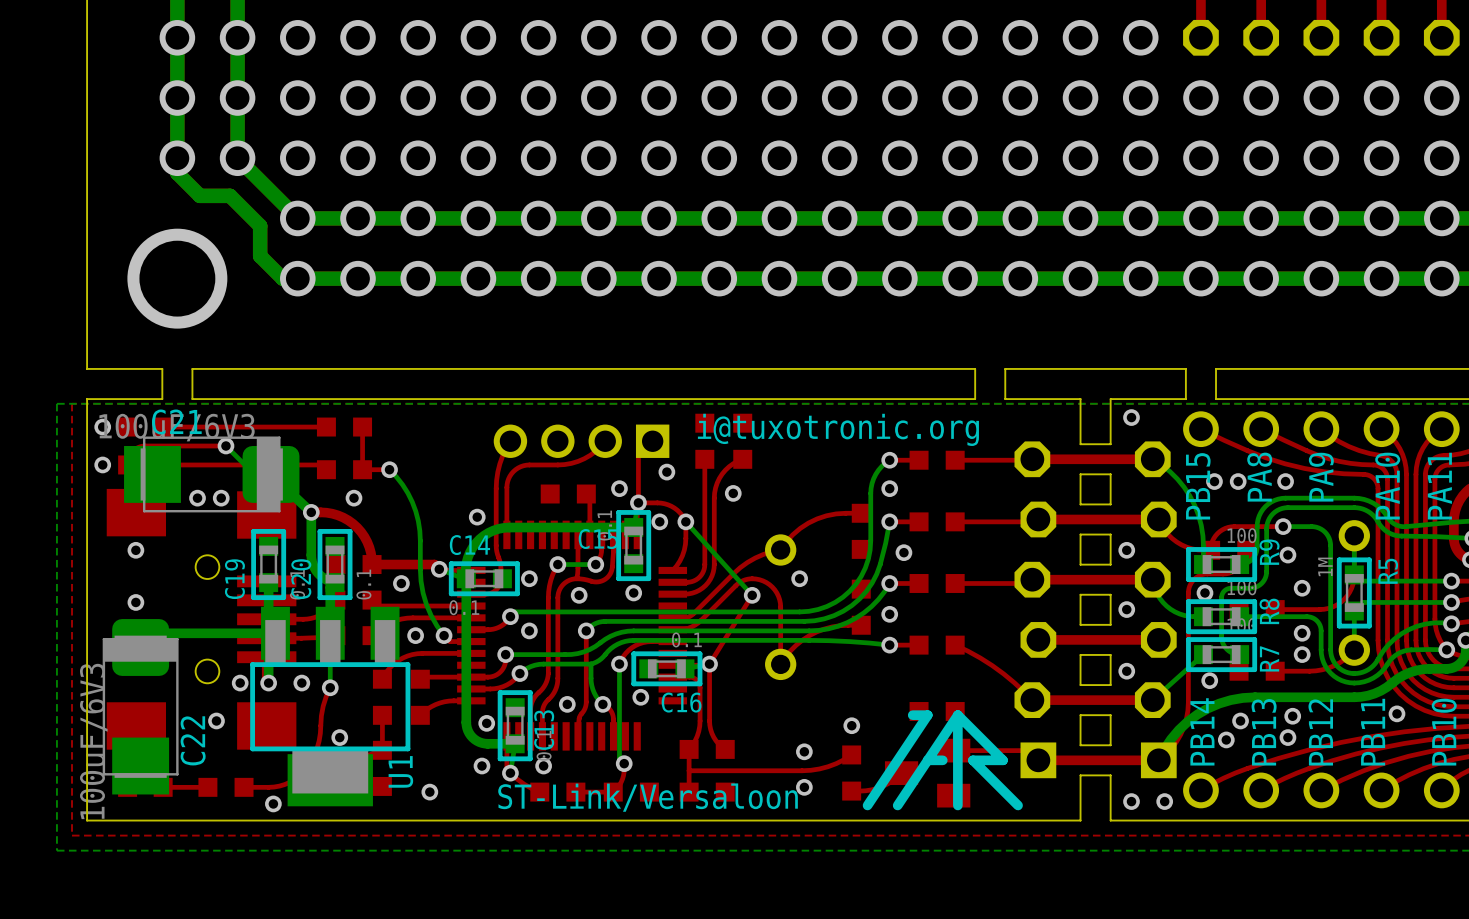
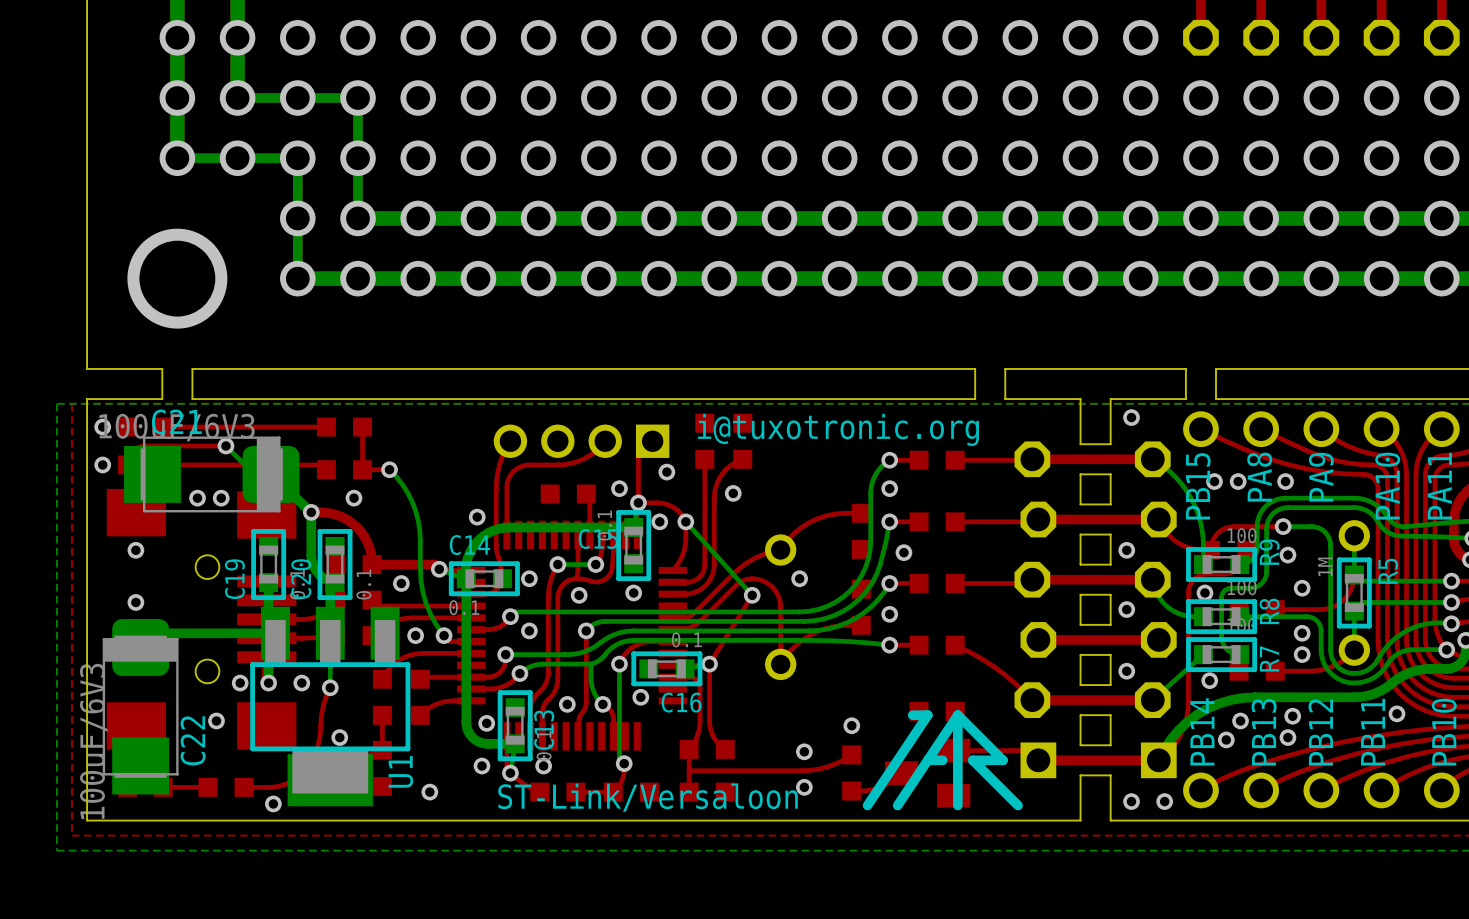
bottom track: (237, 98) (237, 158) (297, 218) (358, 218) -> (237, 98) (358, 98) (358, 218)
bottom track: (177, 158) (177, 173) (199, 195) (230, 195) (260, 225) (260, 256) (282, 278) (297, 278) -> (177, 158) (297, 158) (297, 278)

